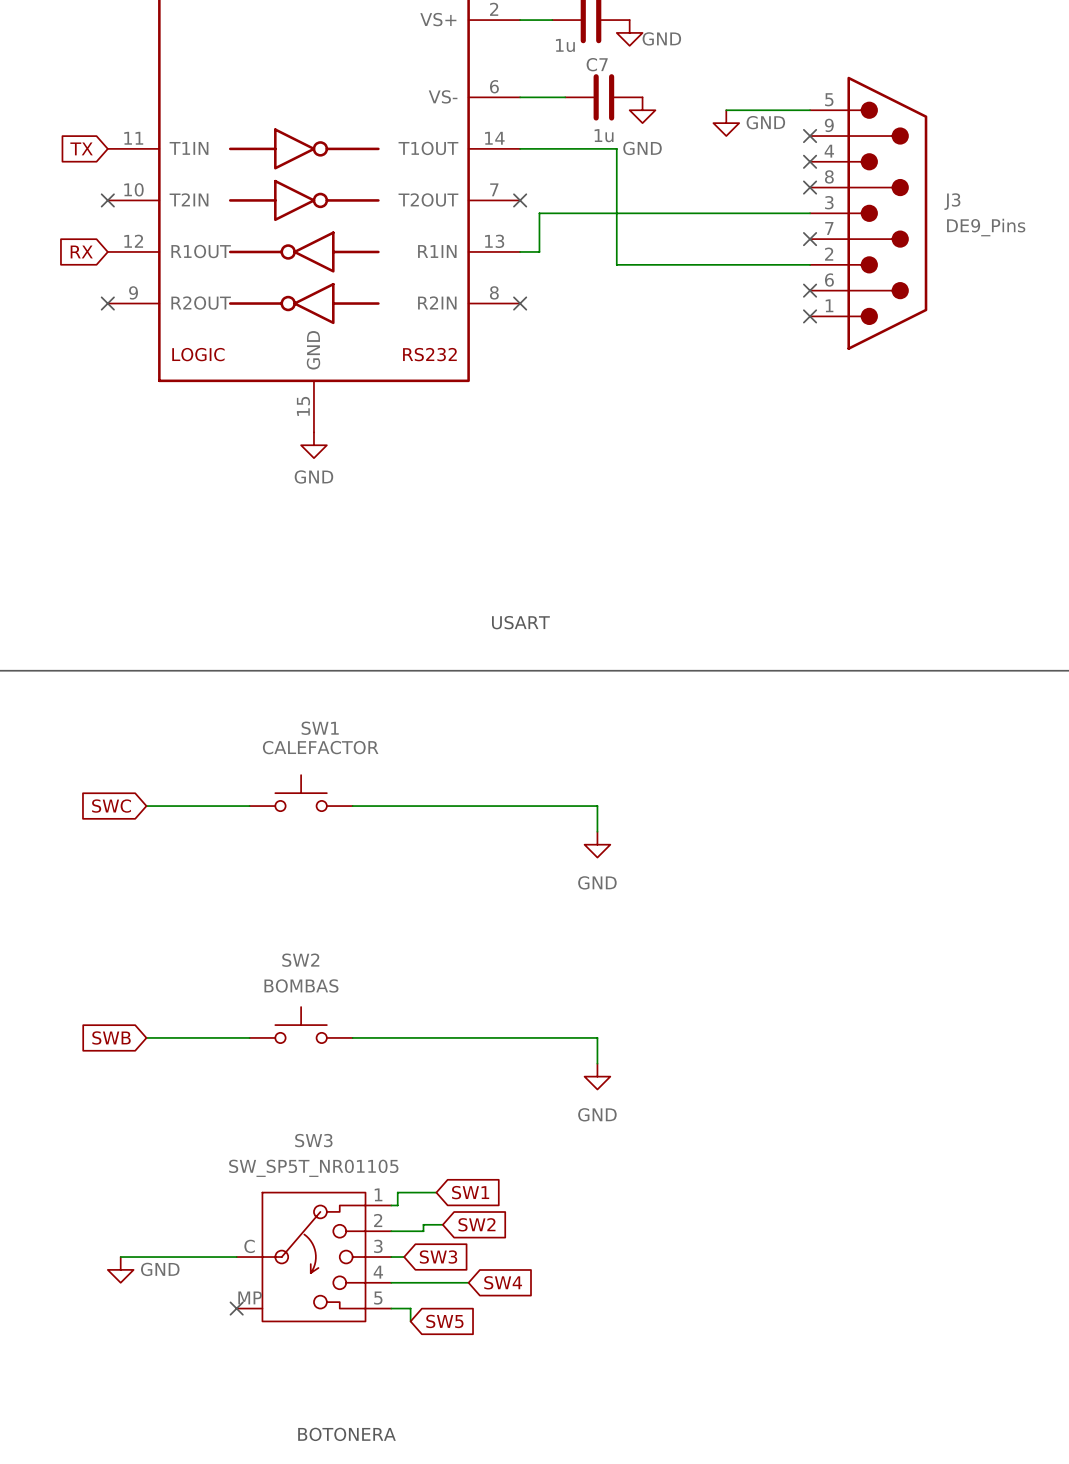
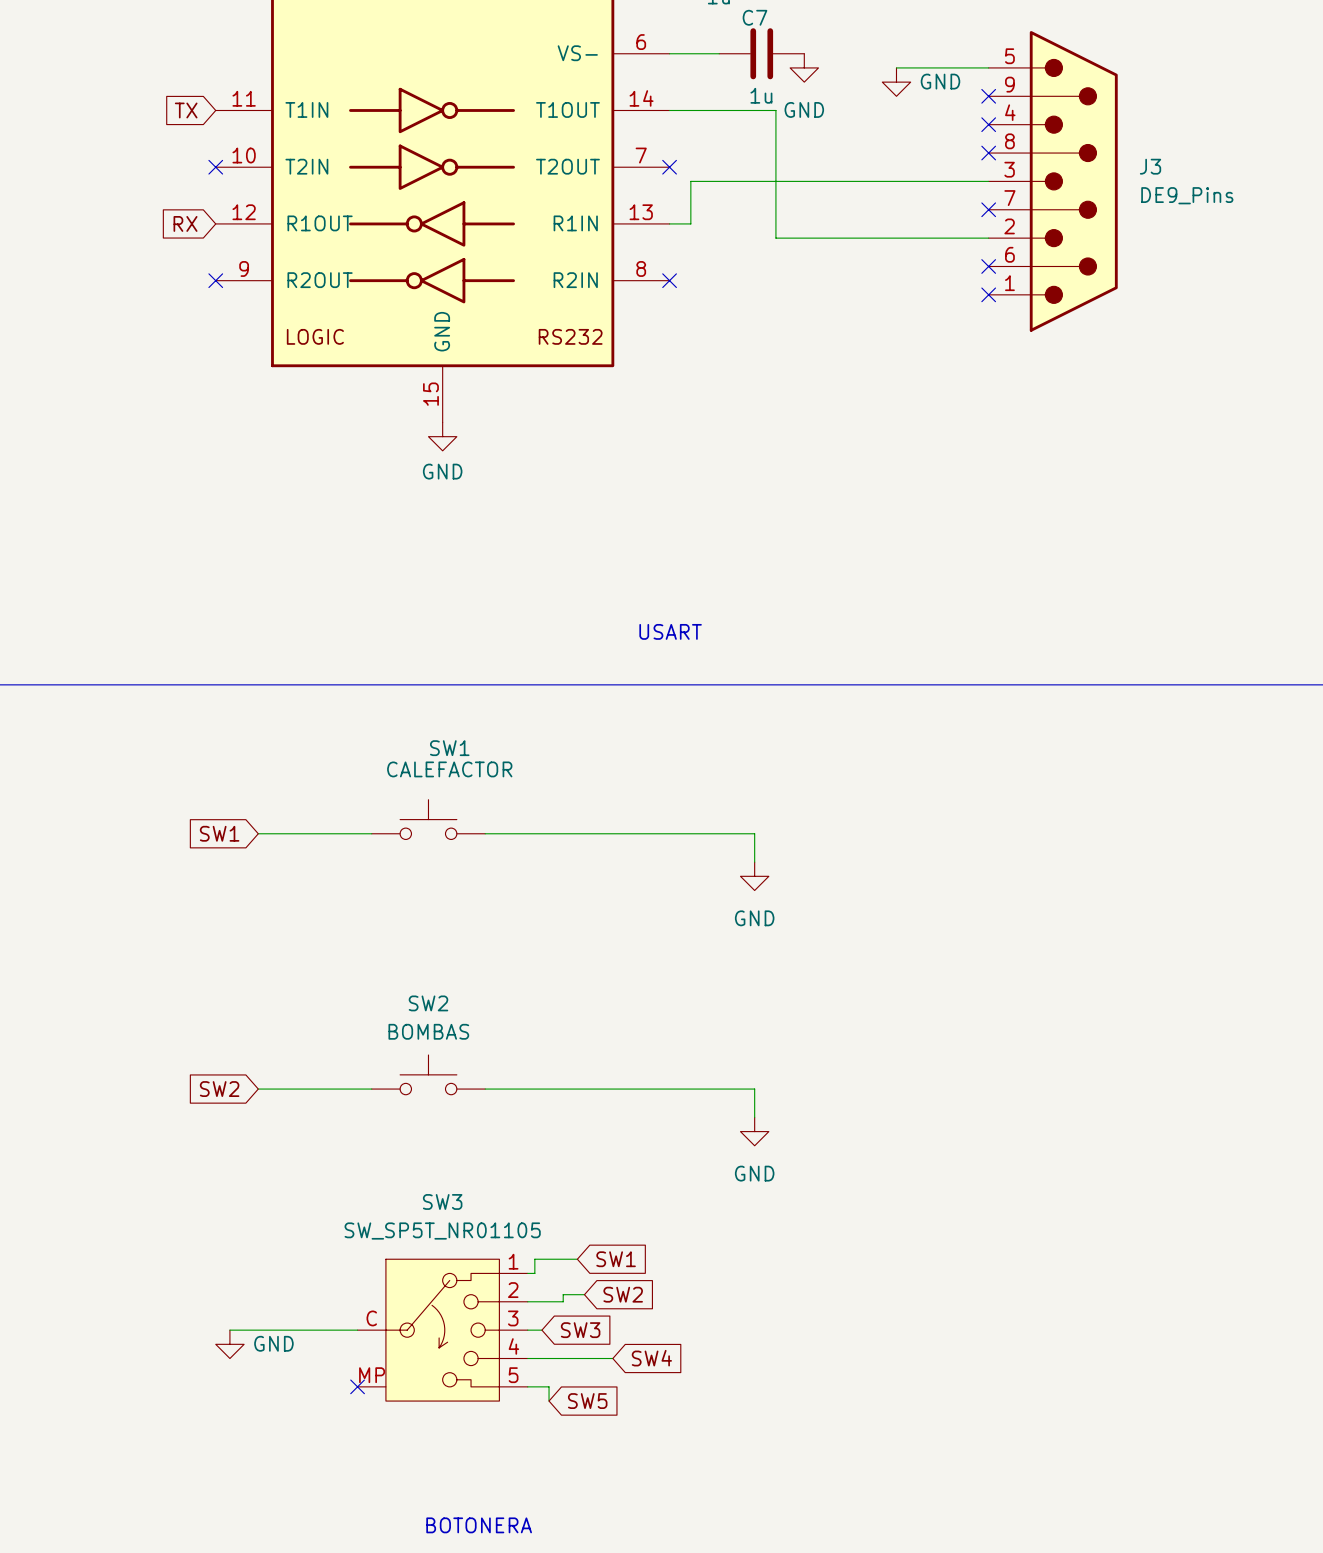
global label: SWC (111, 806) -> SW1 (219, 833)
global label: SWB (111, 1037) -> SW2 (219, 1089)

